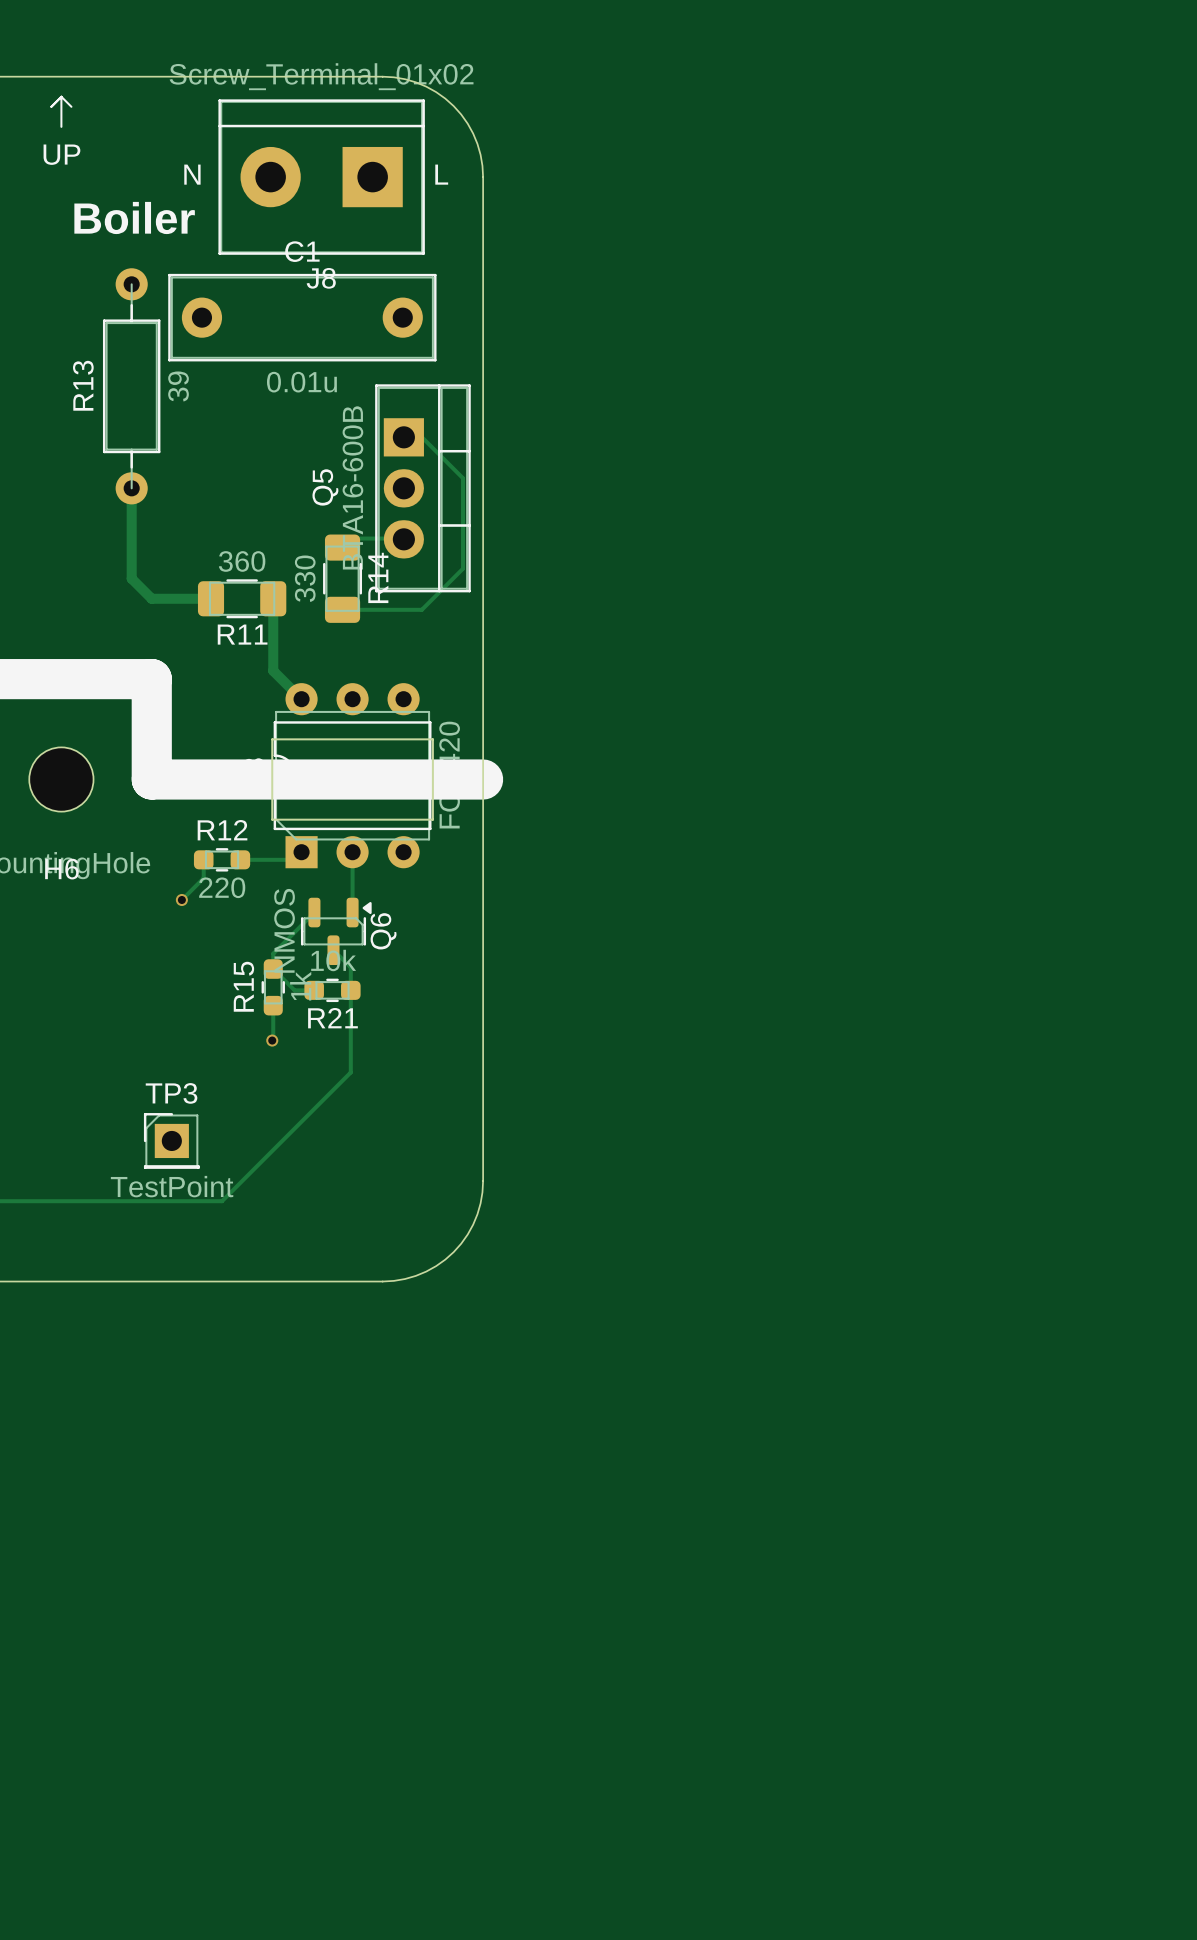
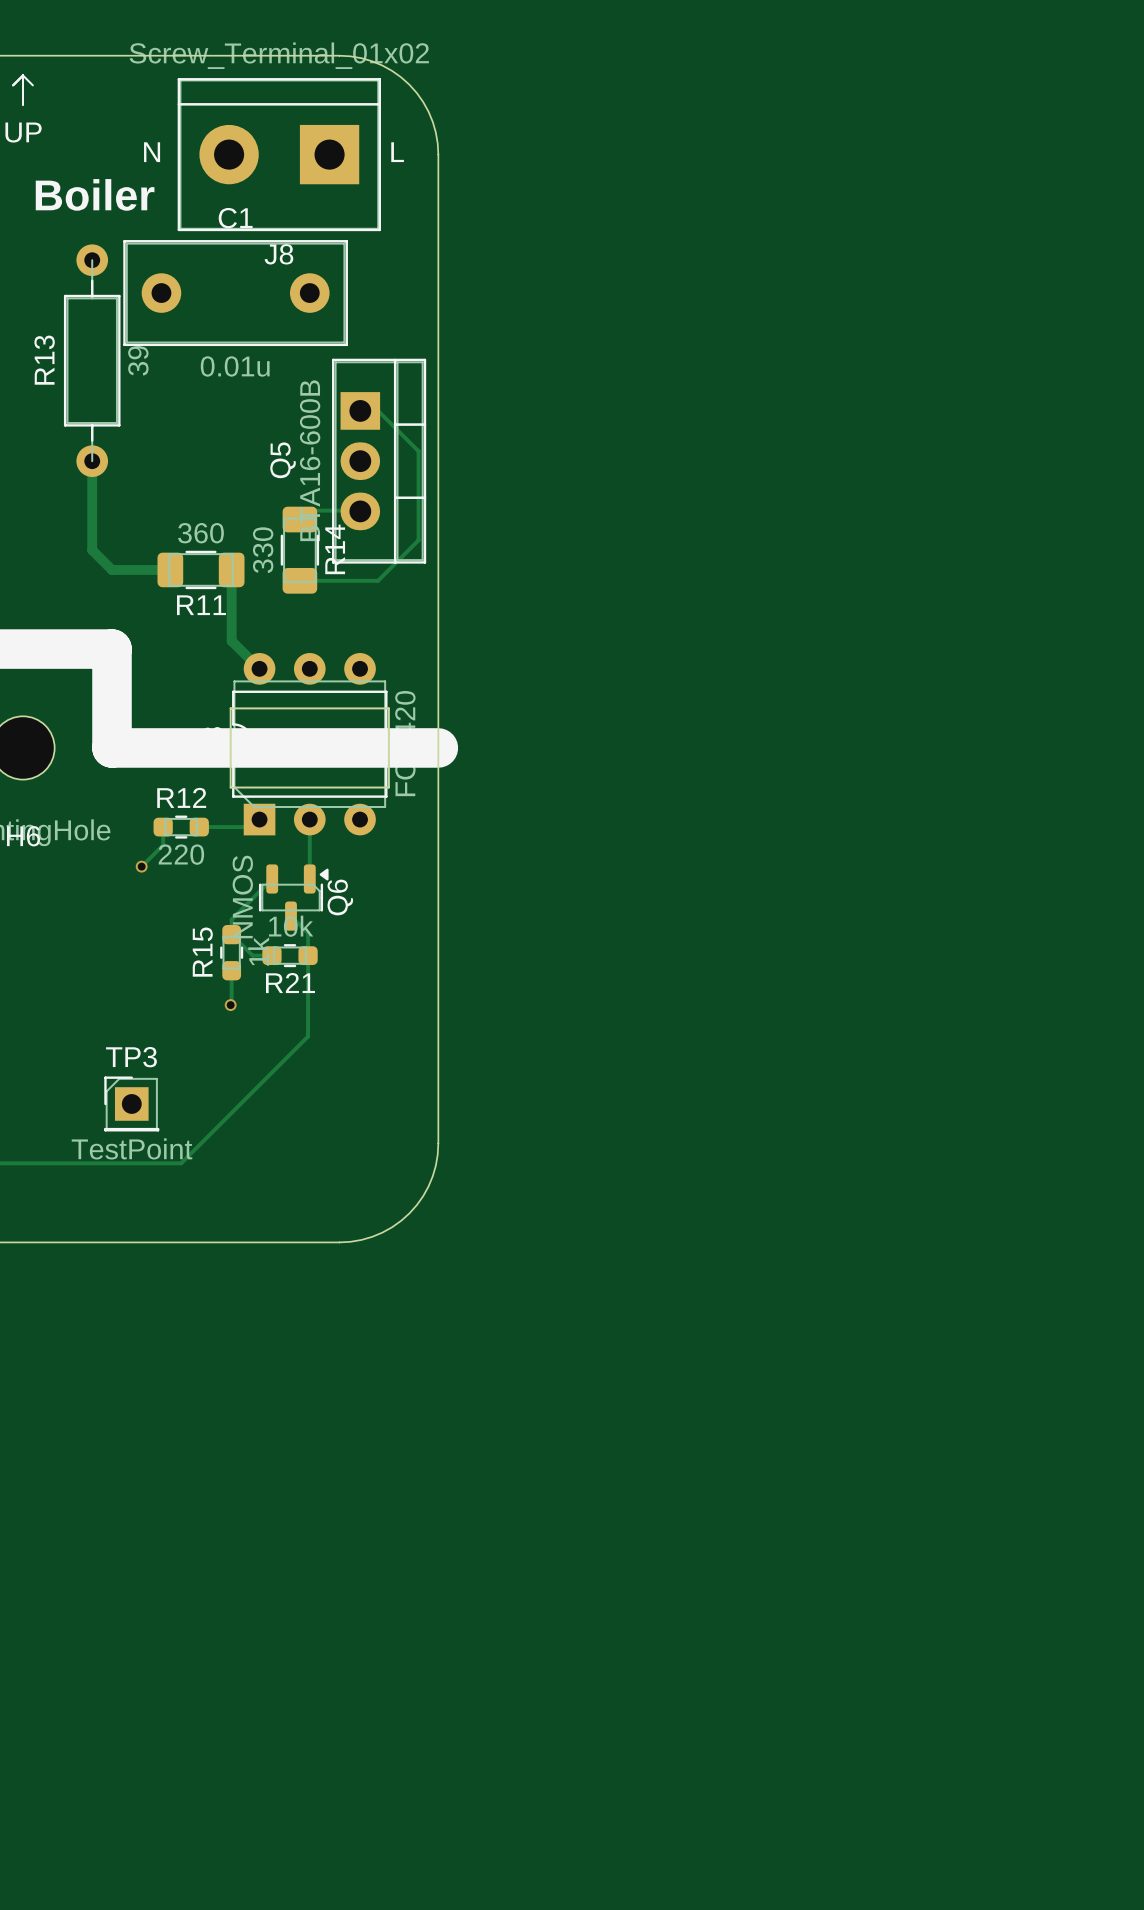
C1 footprint: [168, 273, 437, 362] -> [123, 240, 348, 347]

